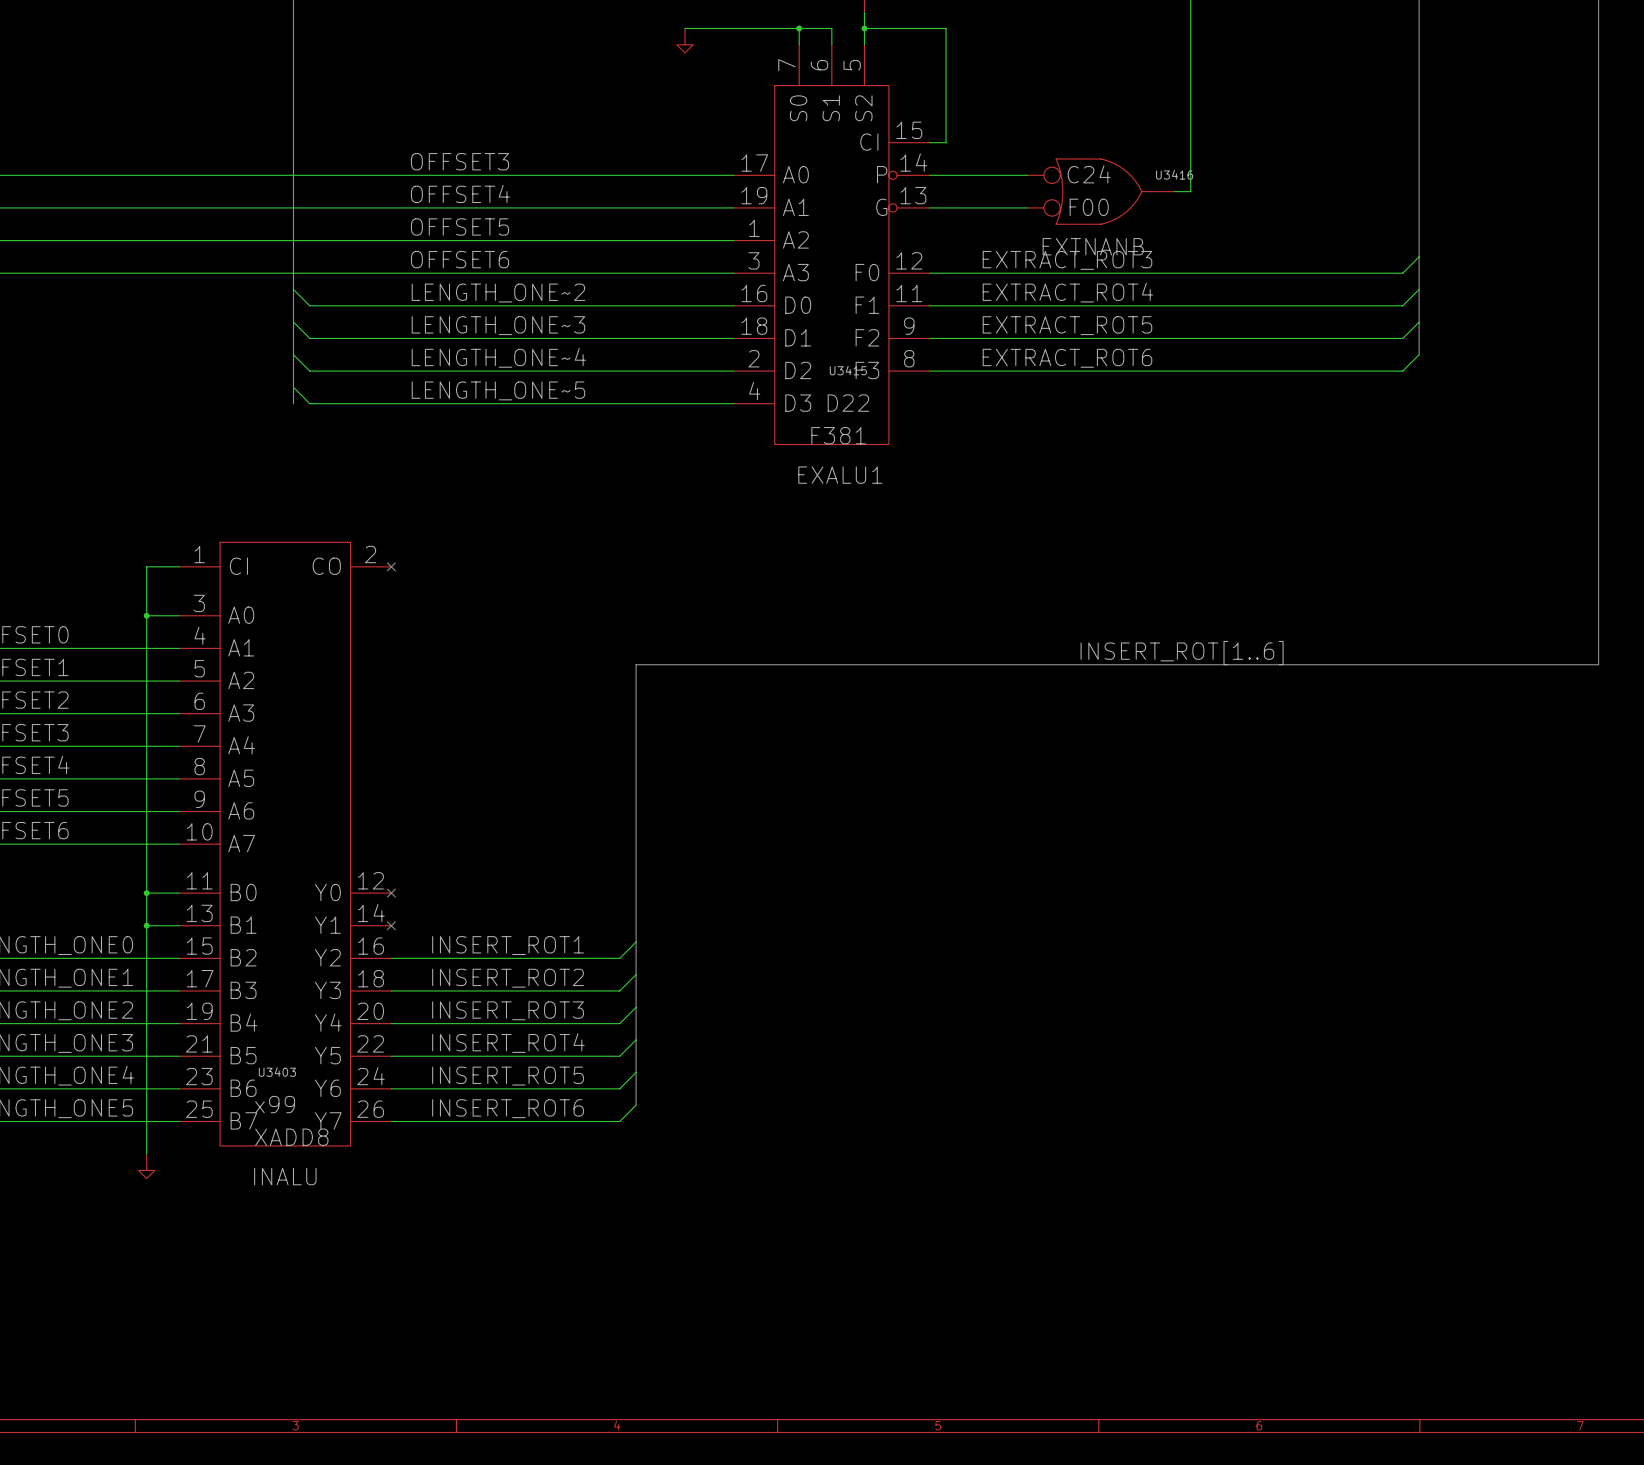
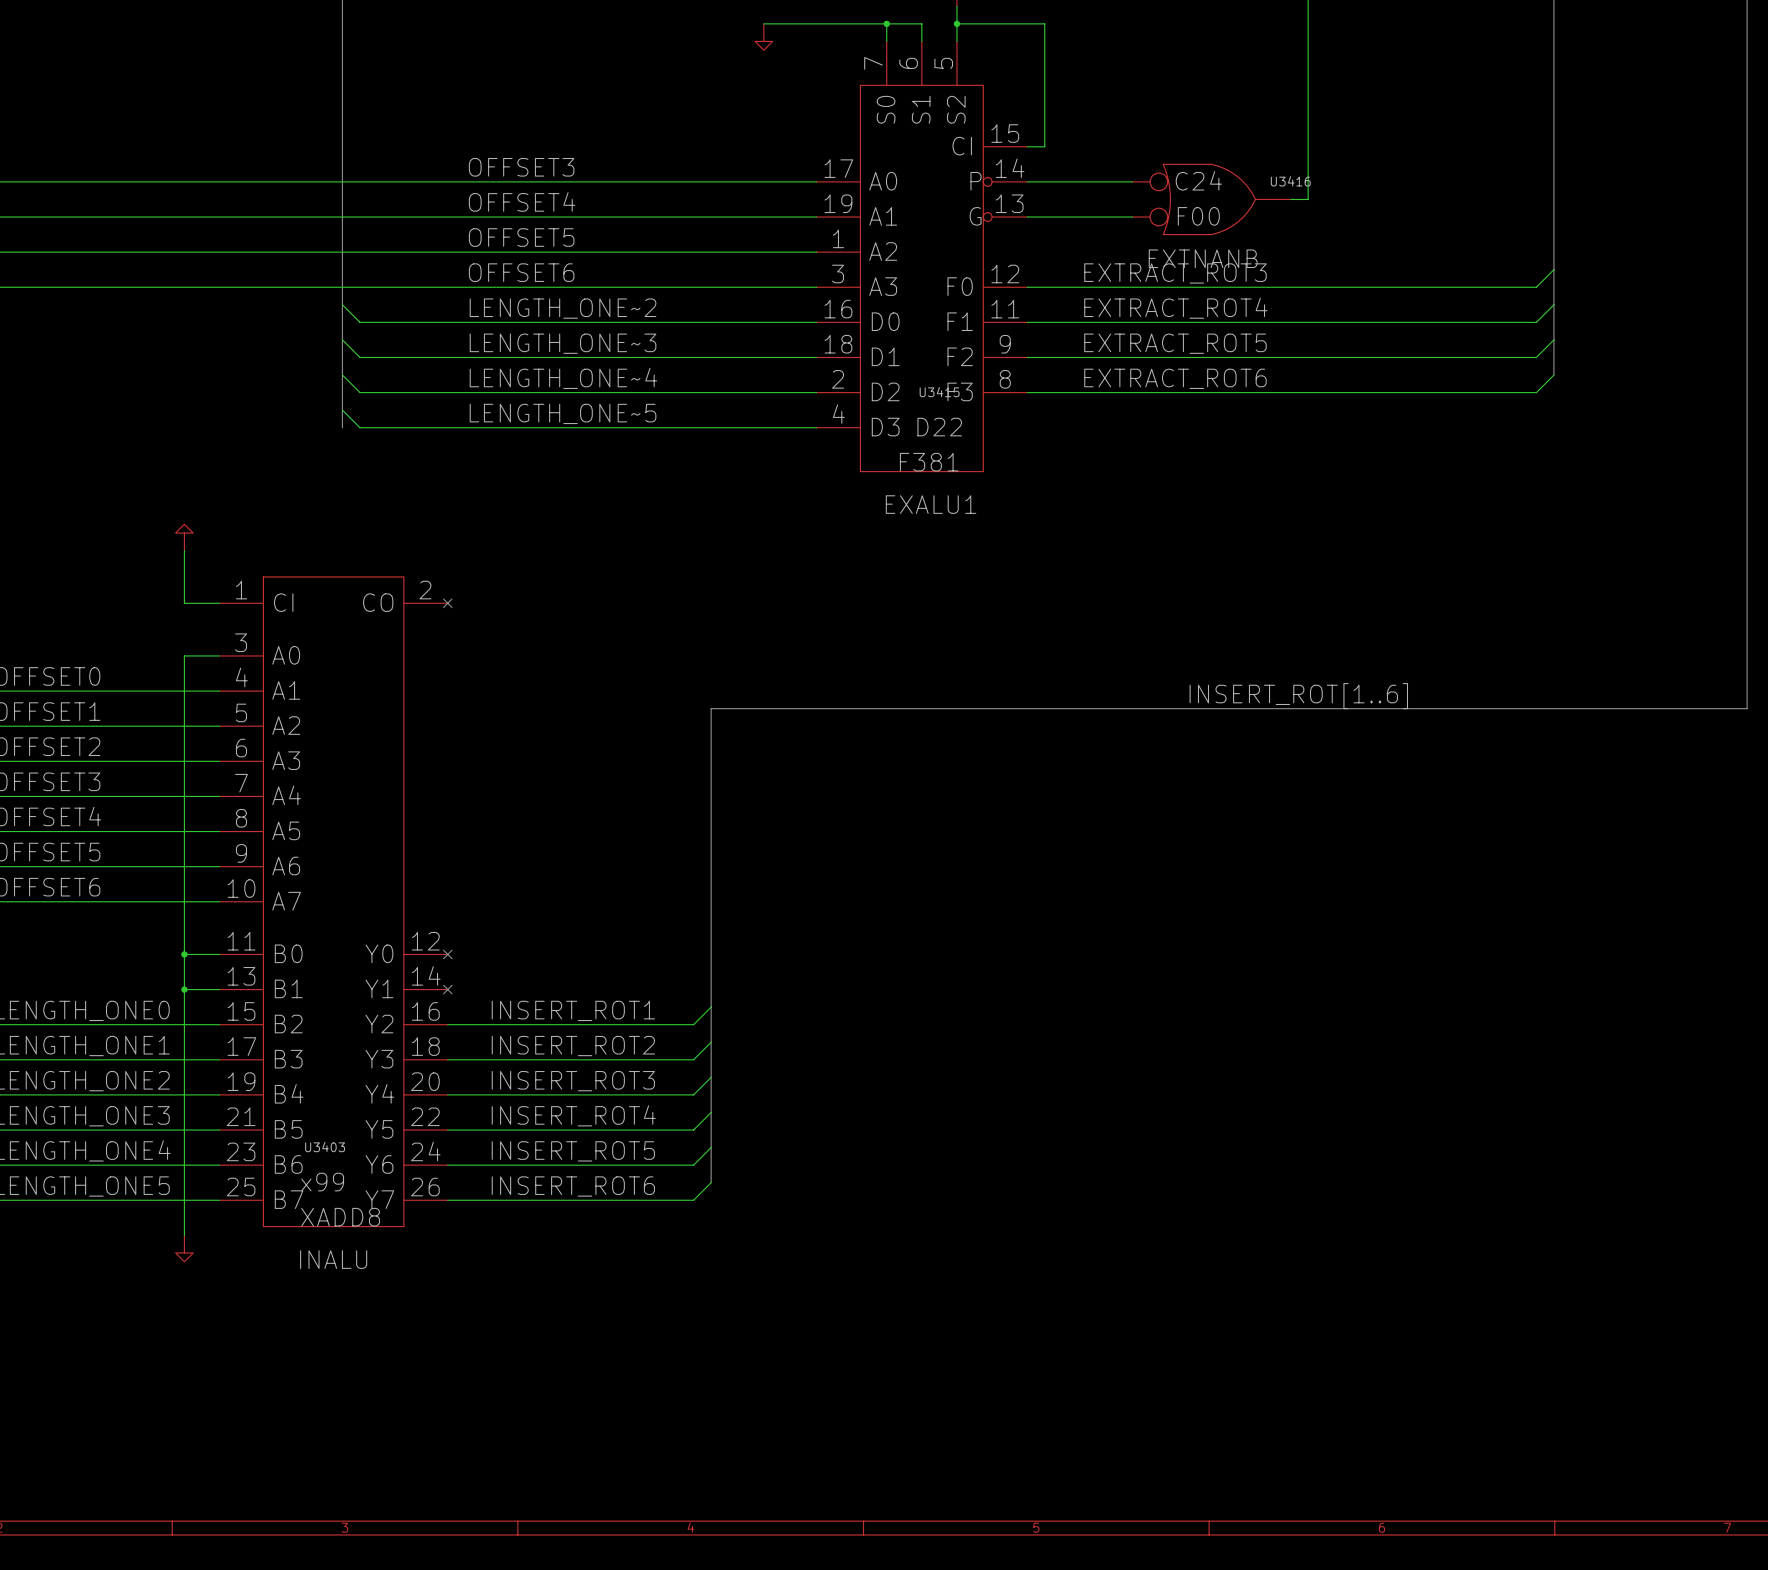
power symbol: none -> (184, 537)
wire: (146, 566) (146, 615) -> (184, 603) (184, 550)
junction: (146, 615) -> none

